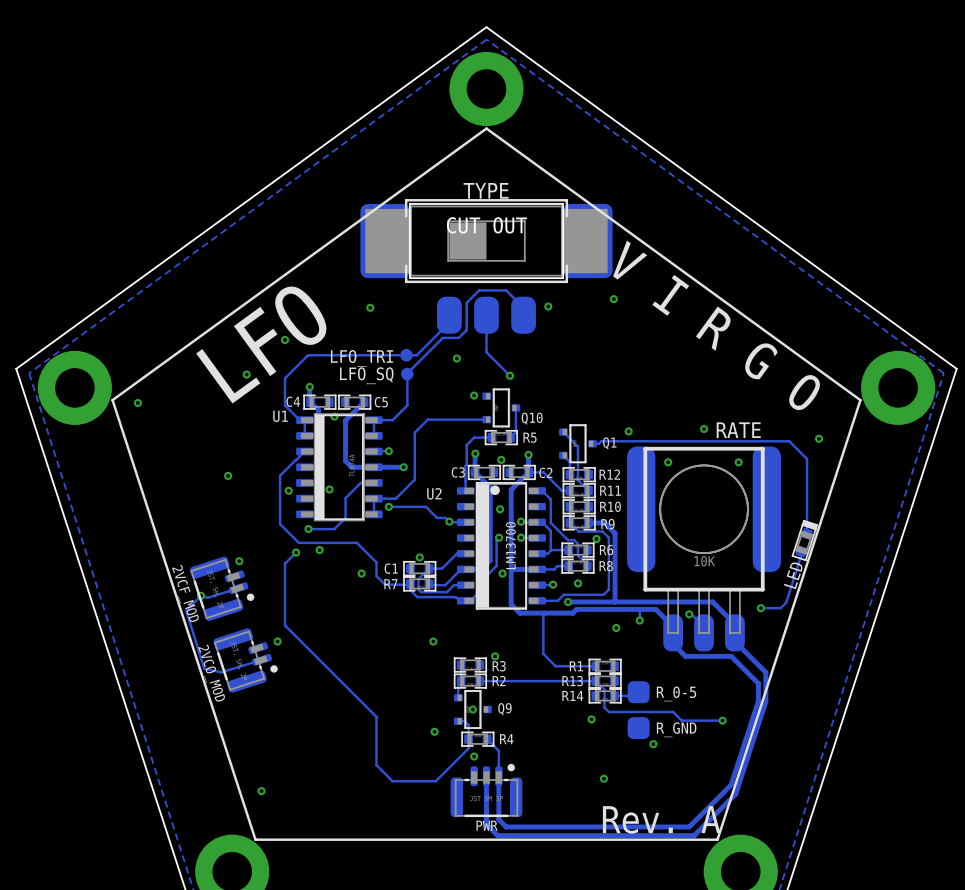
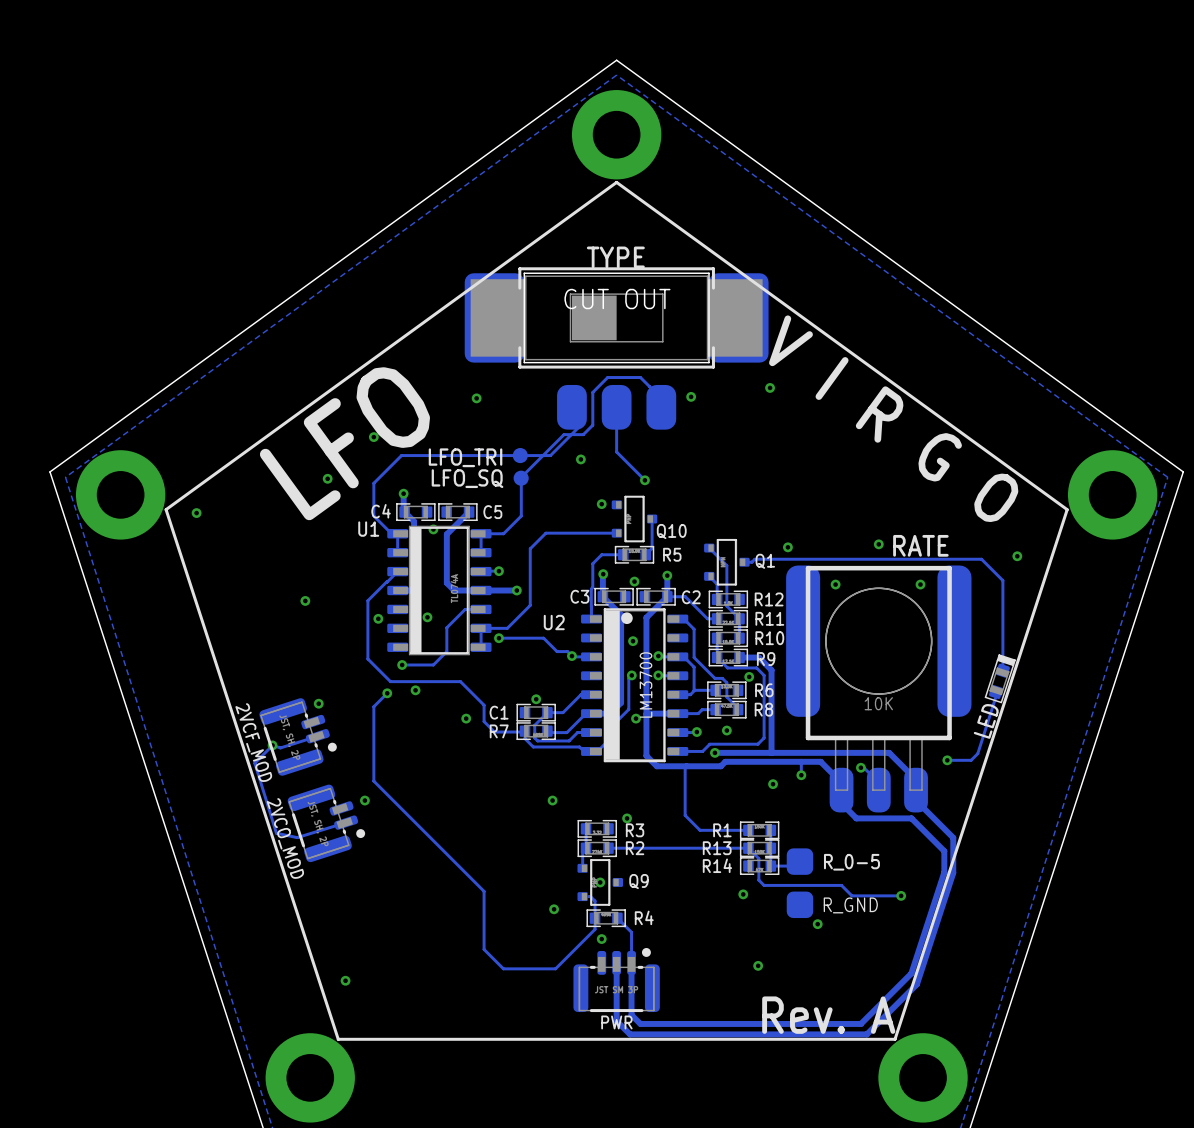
track: (449, 315) (449, 322) (416, 355) -> (583, 393) (583, 422) (550, 455) (532, 455)

